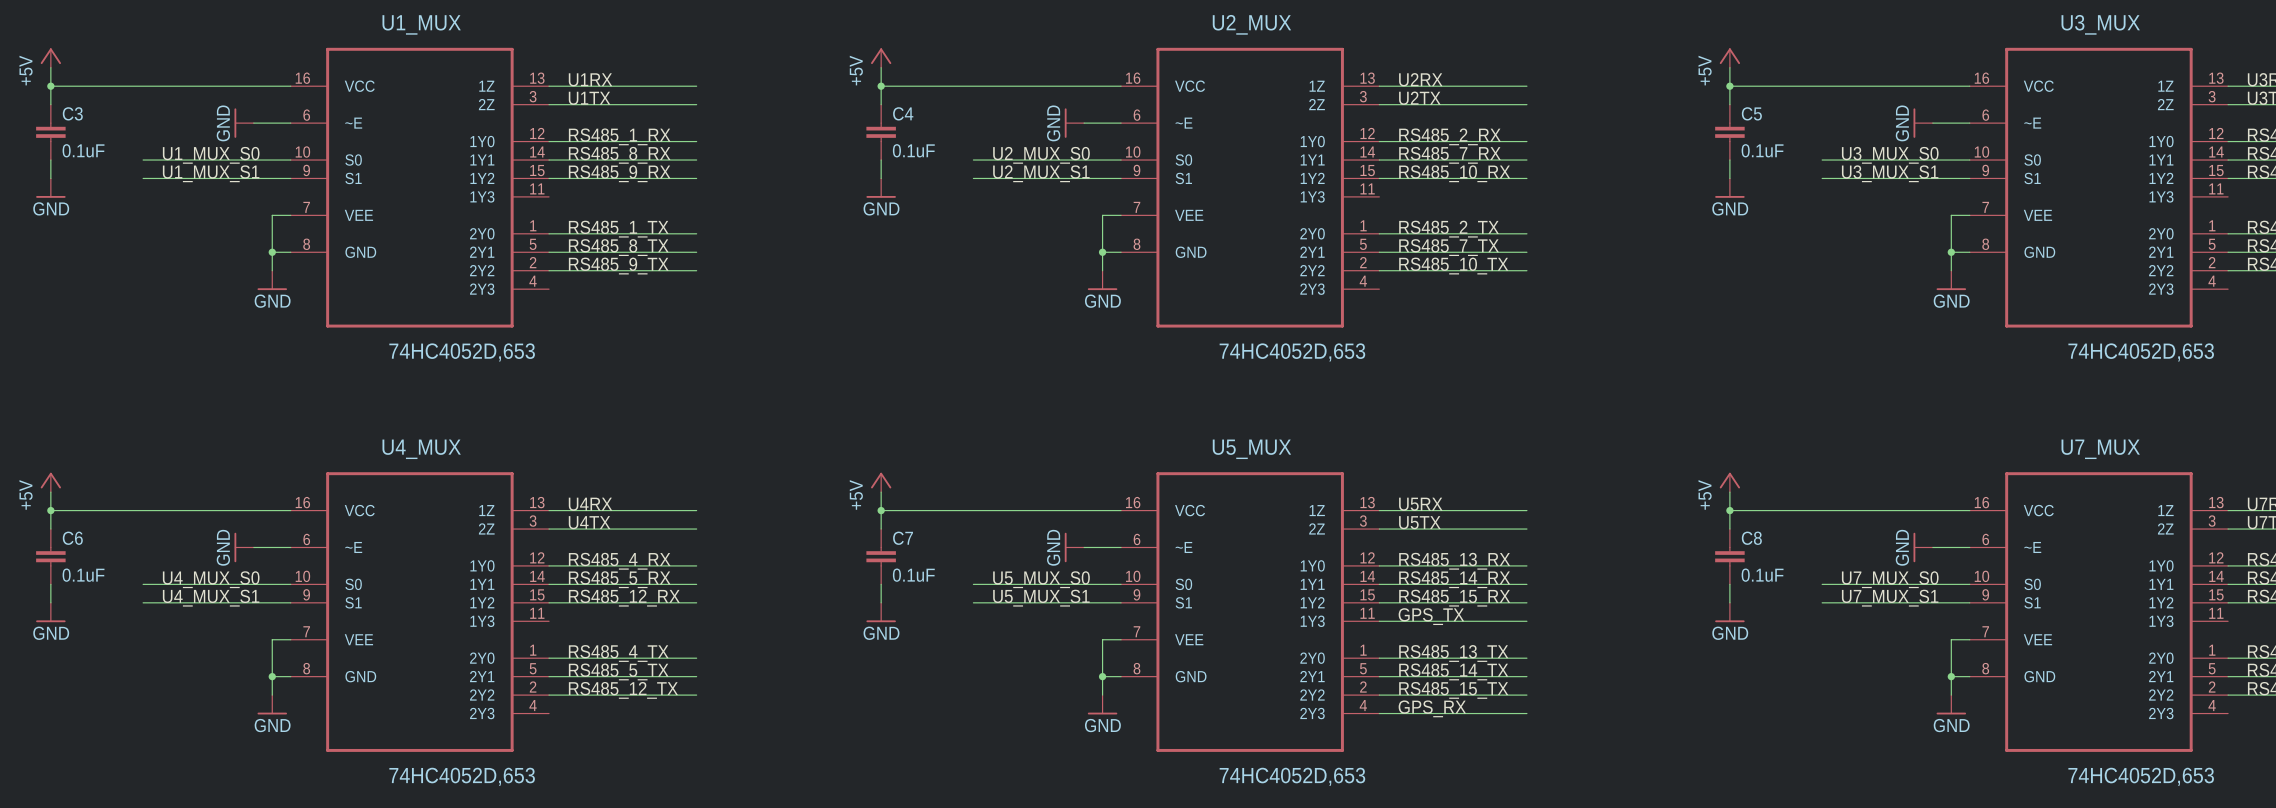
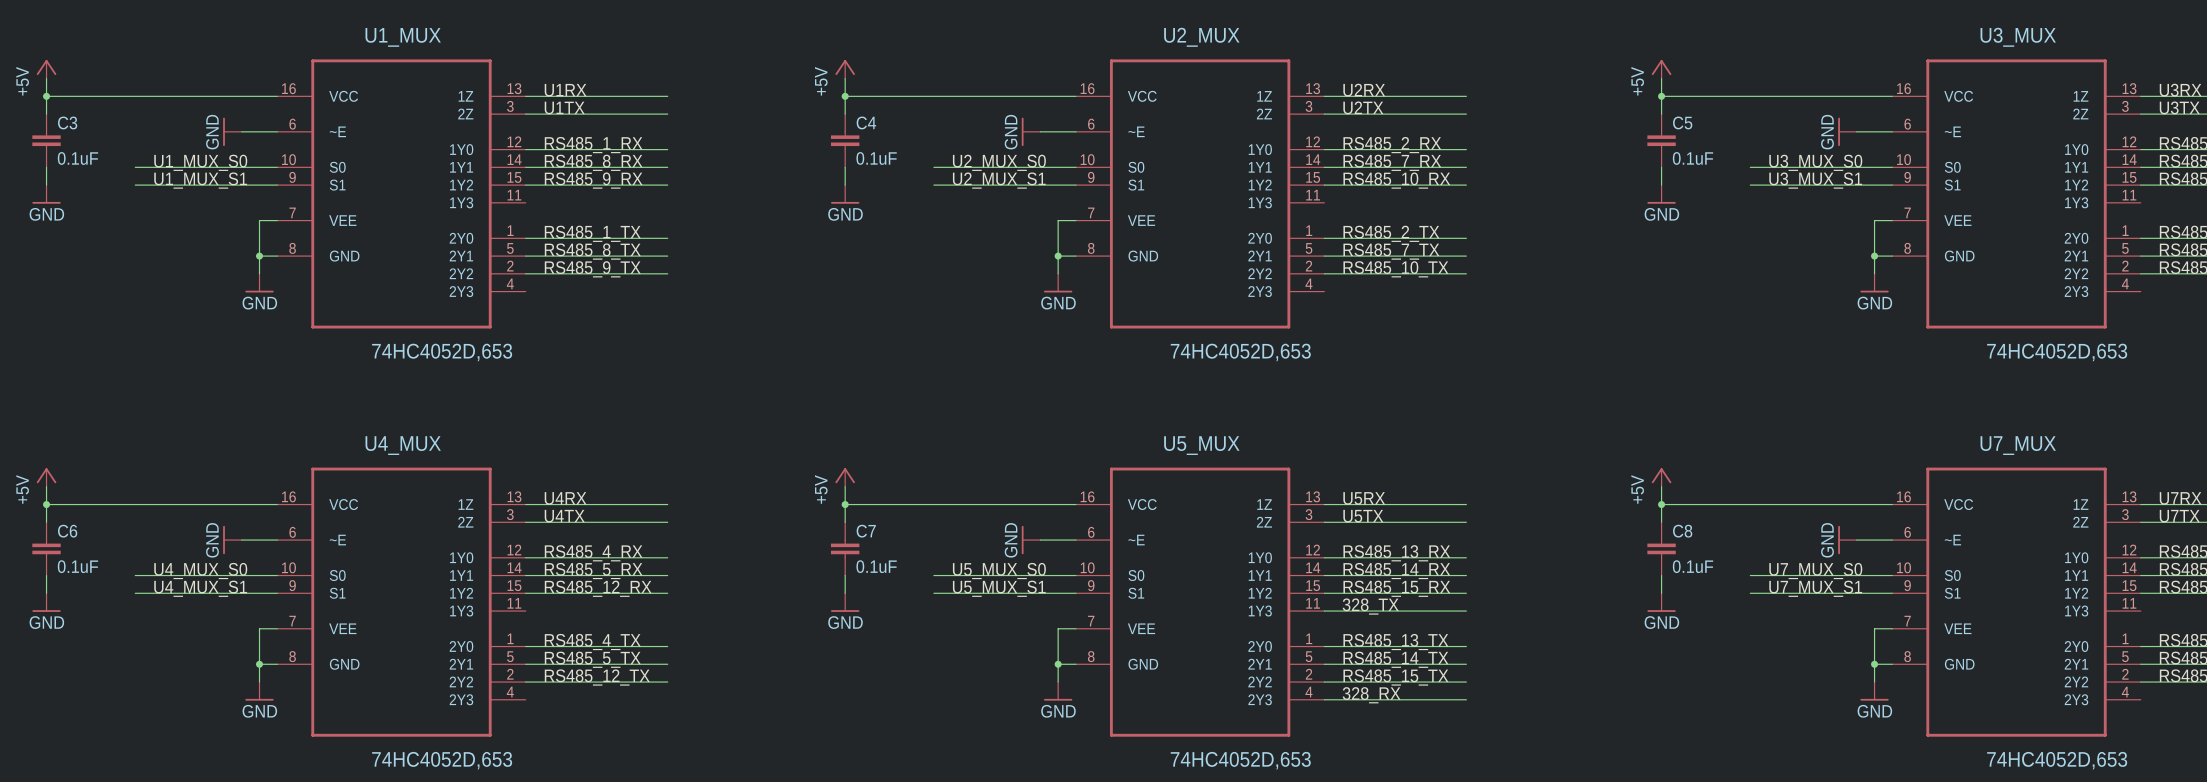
label: GPS_TX (1431, 616) -> 328_TX (1370, 606)
label: GPS_RX (1432, 708) -> 328_RX (1371, 695)

